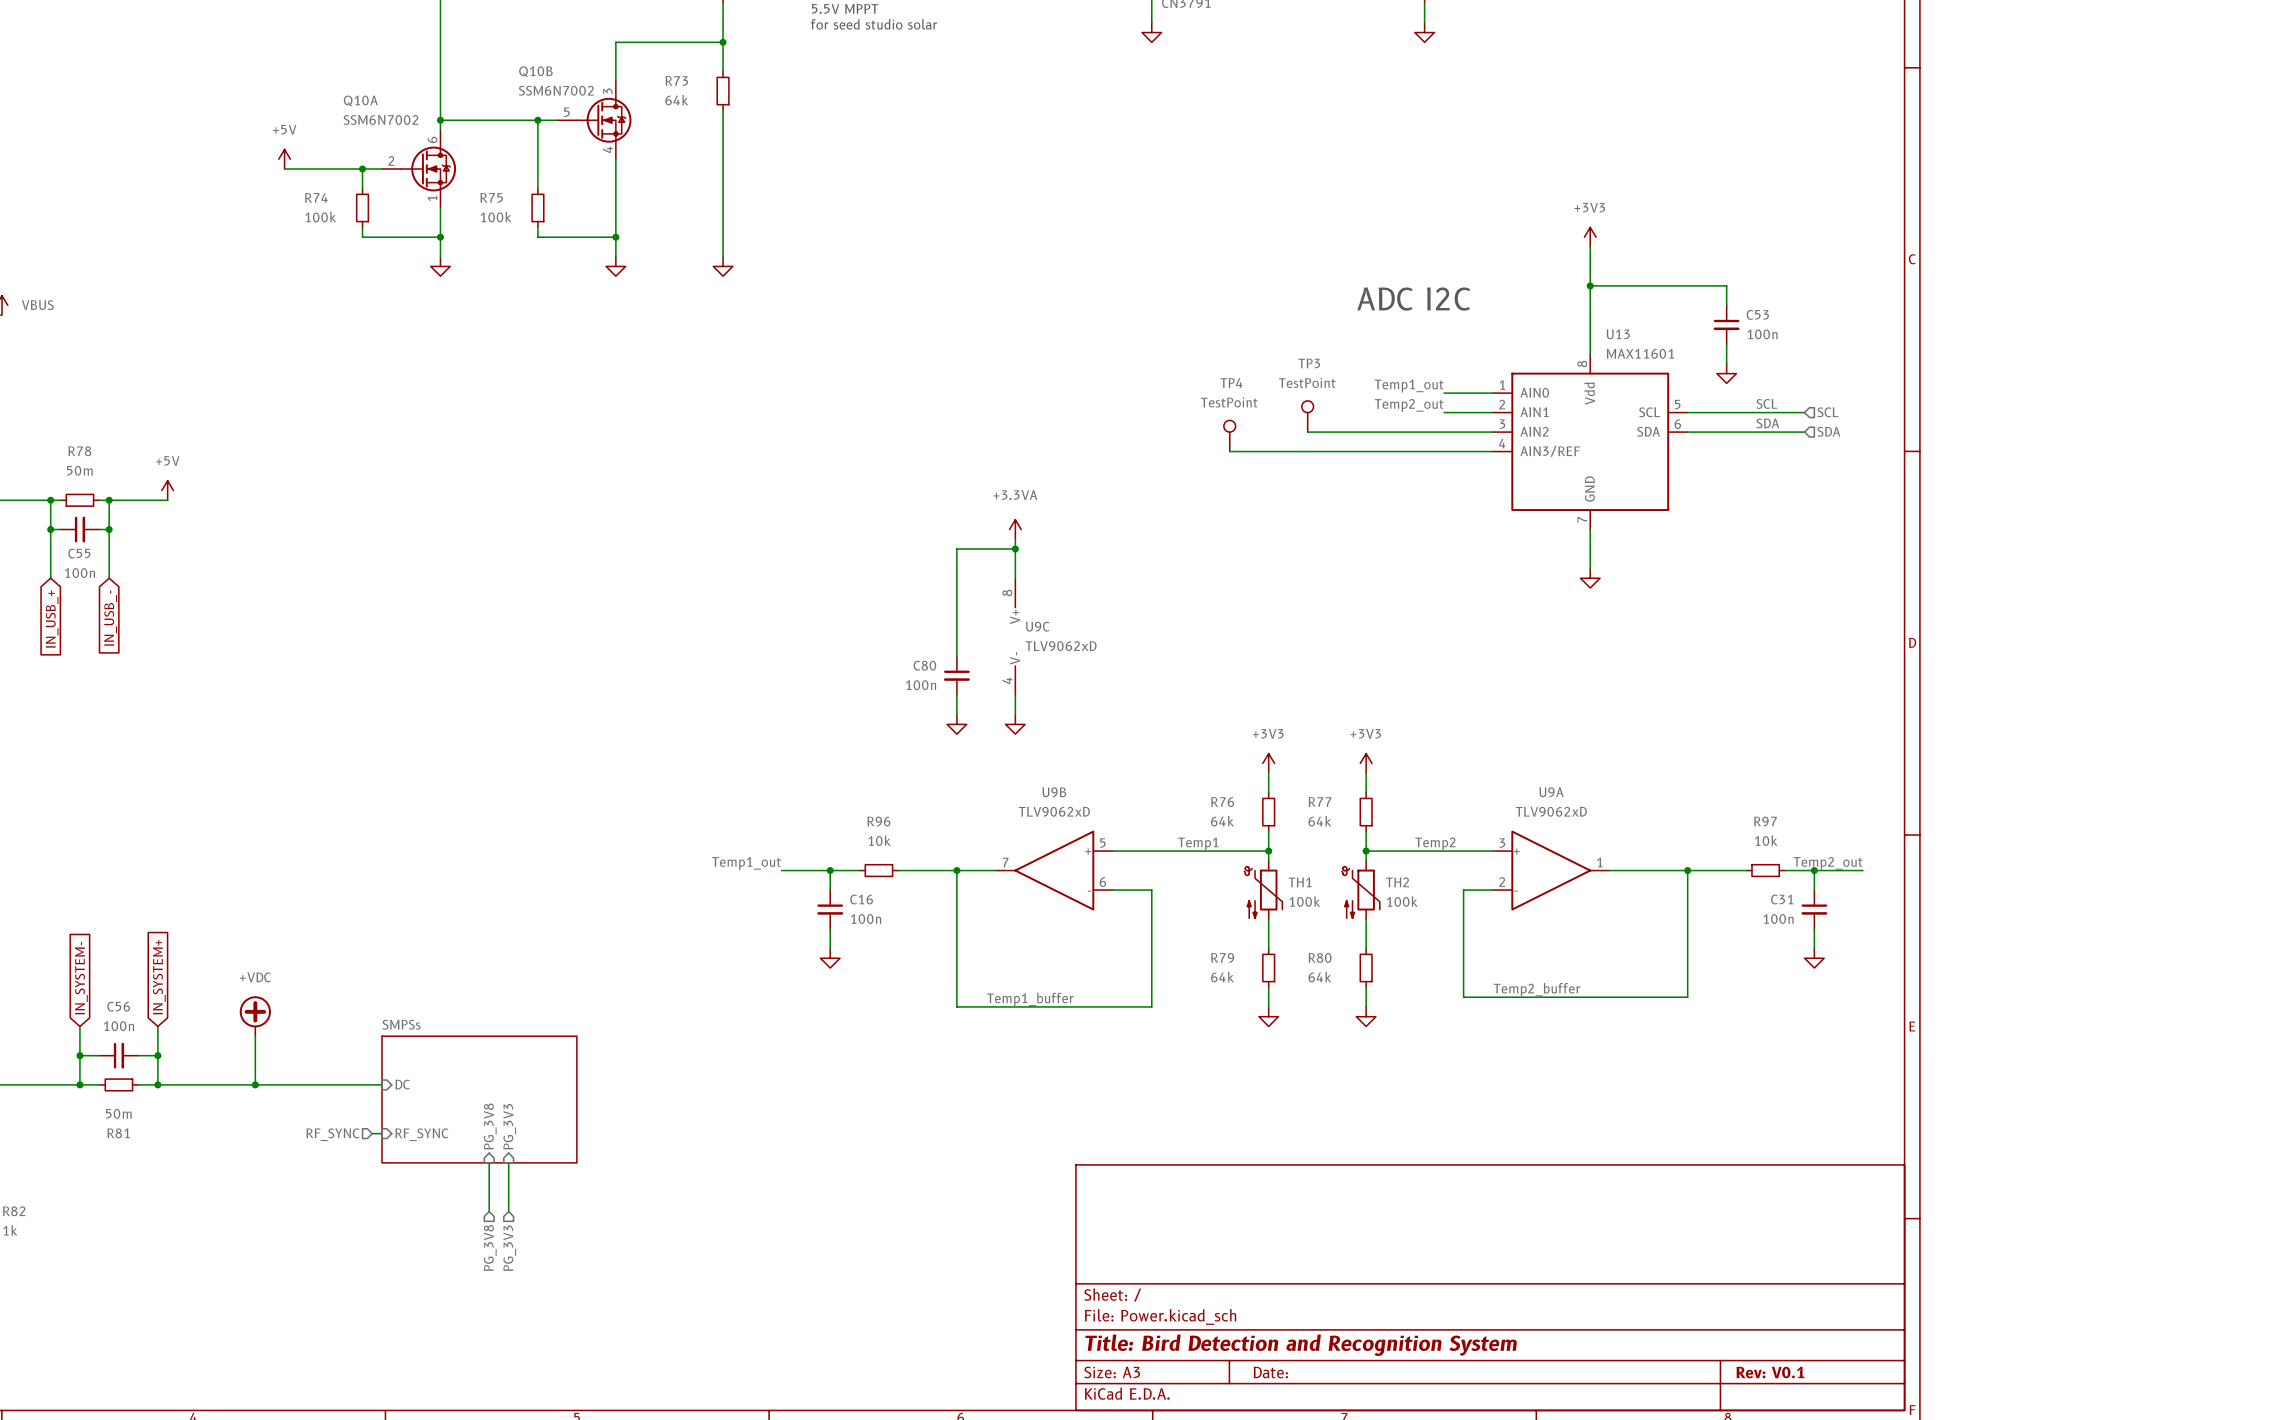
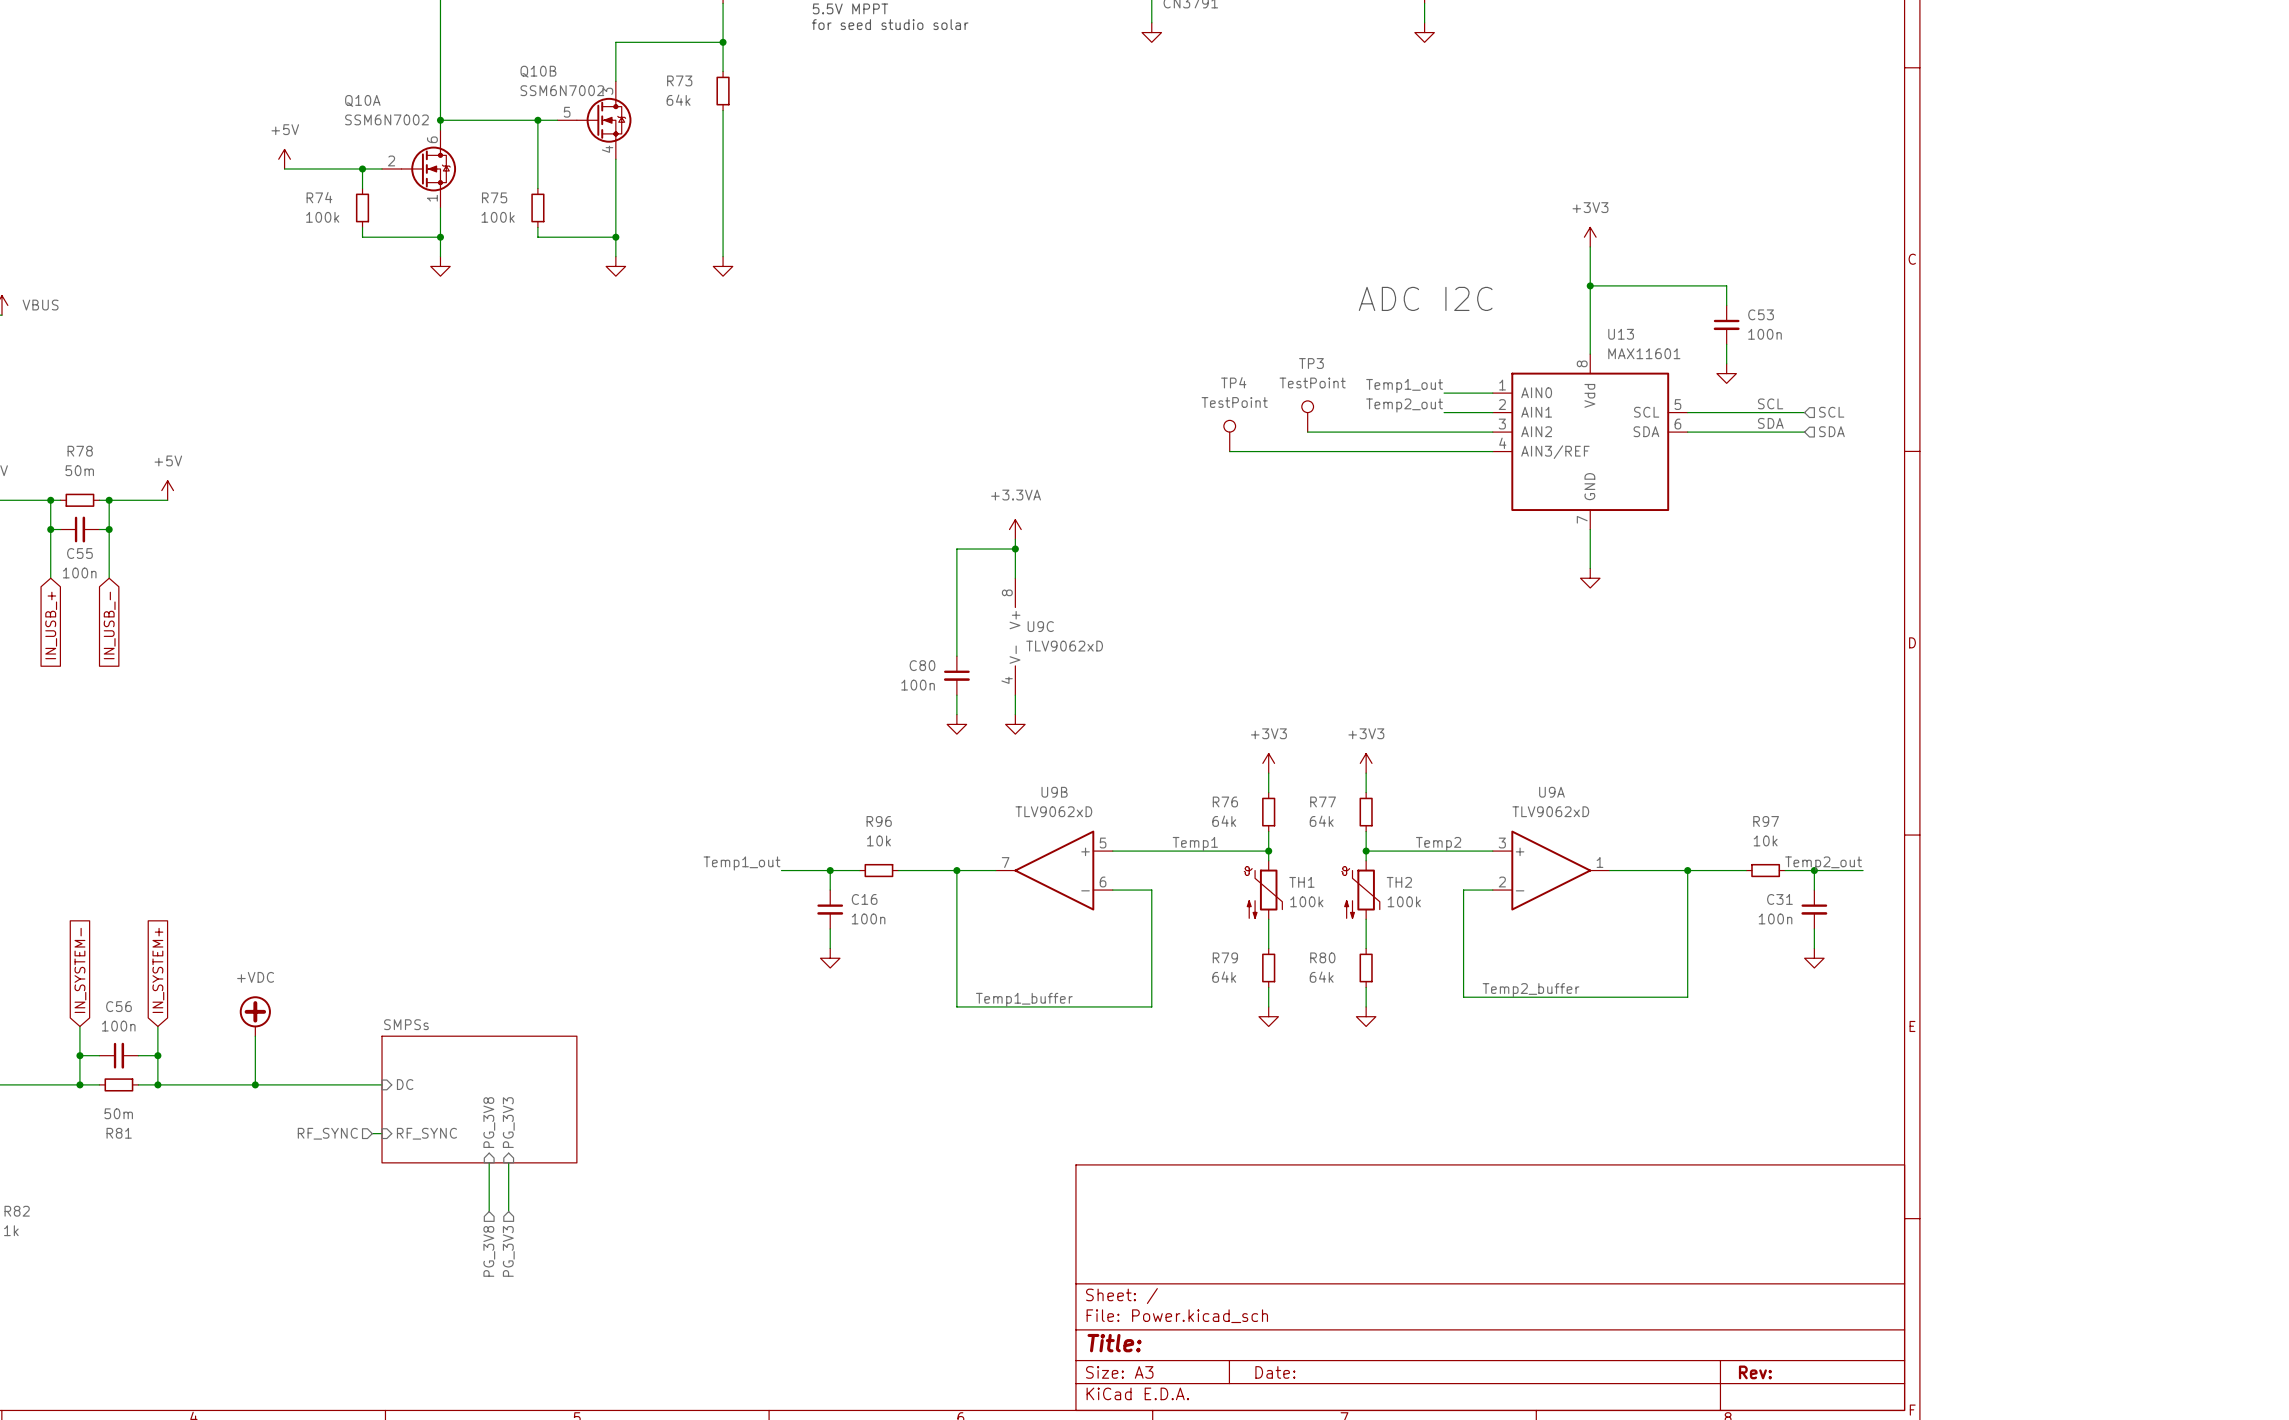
title block: Title: Bird Detection and Recognition System (1301, 1345) -> Title: (1114, 1343)
title block: Rev: V0.1 (1770, 1372) -> Rev: (1755, 1372)

